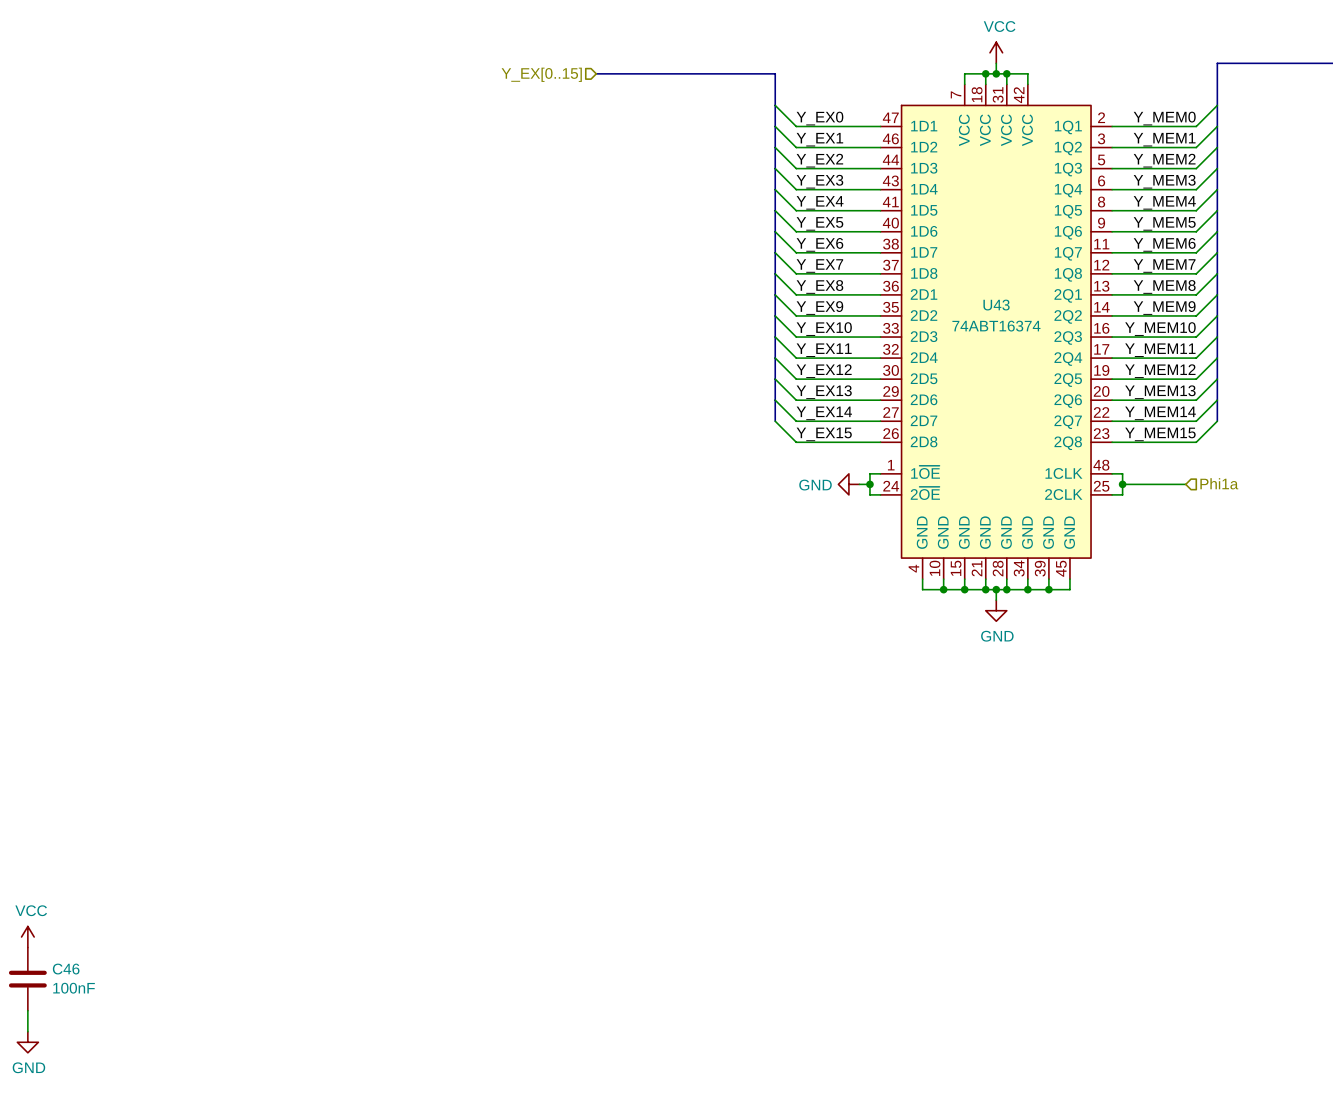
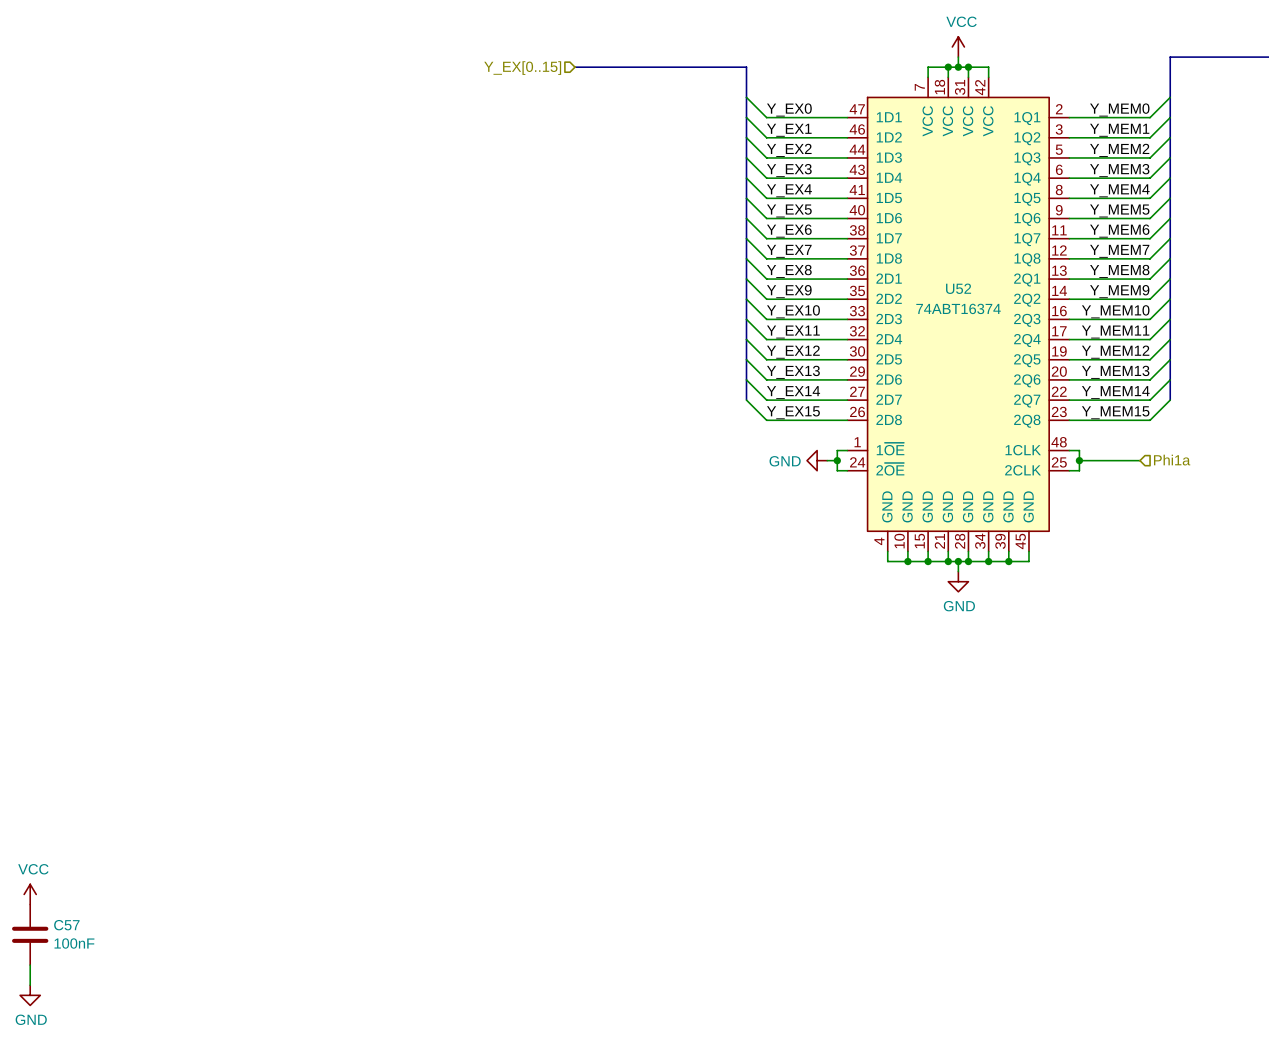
U43 name: U43 (996, 305) -> U52 (958, 288)
C46 name: C46 (66, 969) -> C57 (66, 925)

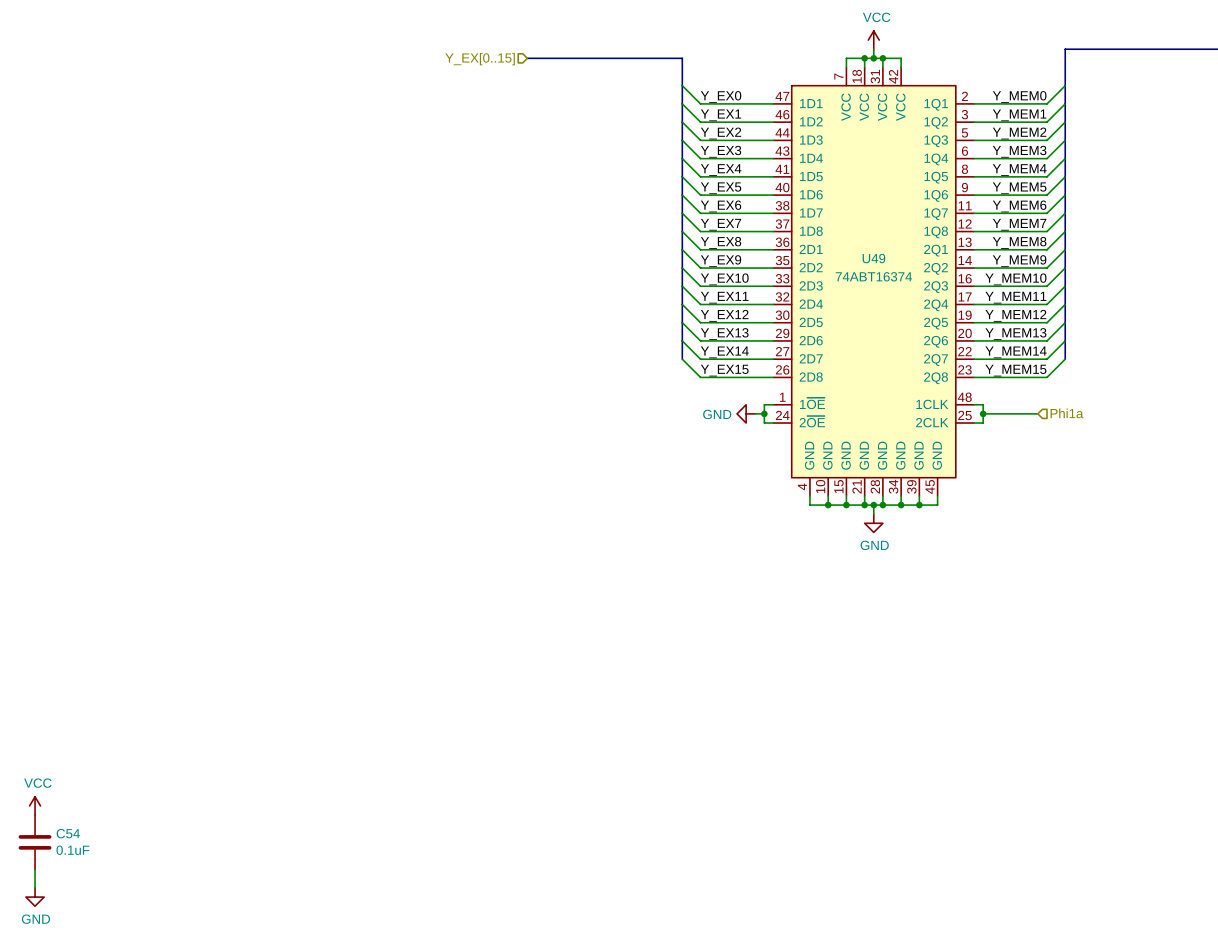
U52 name: U52 (958, 288) -> U49 (873, 258)
C57 name: C57 (66, 925) -> C54 (68, 833)
C57 value: 100nF (74, 943) -> 0.1uF (72, 850)

